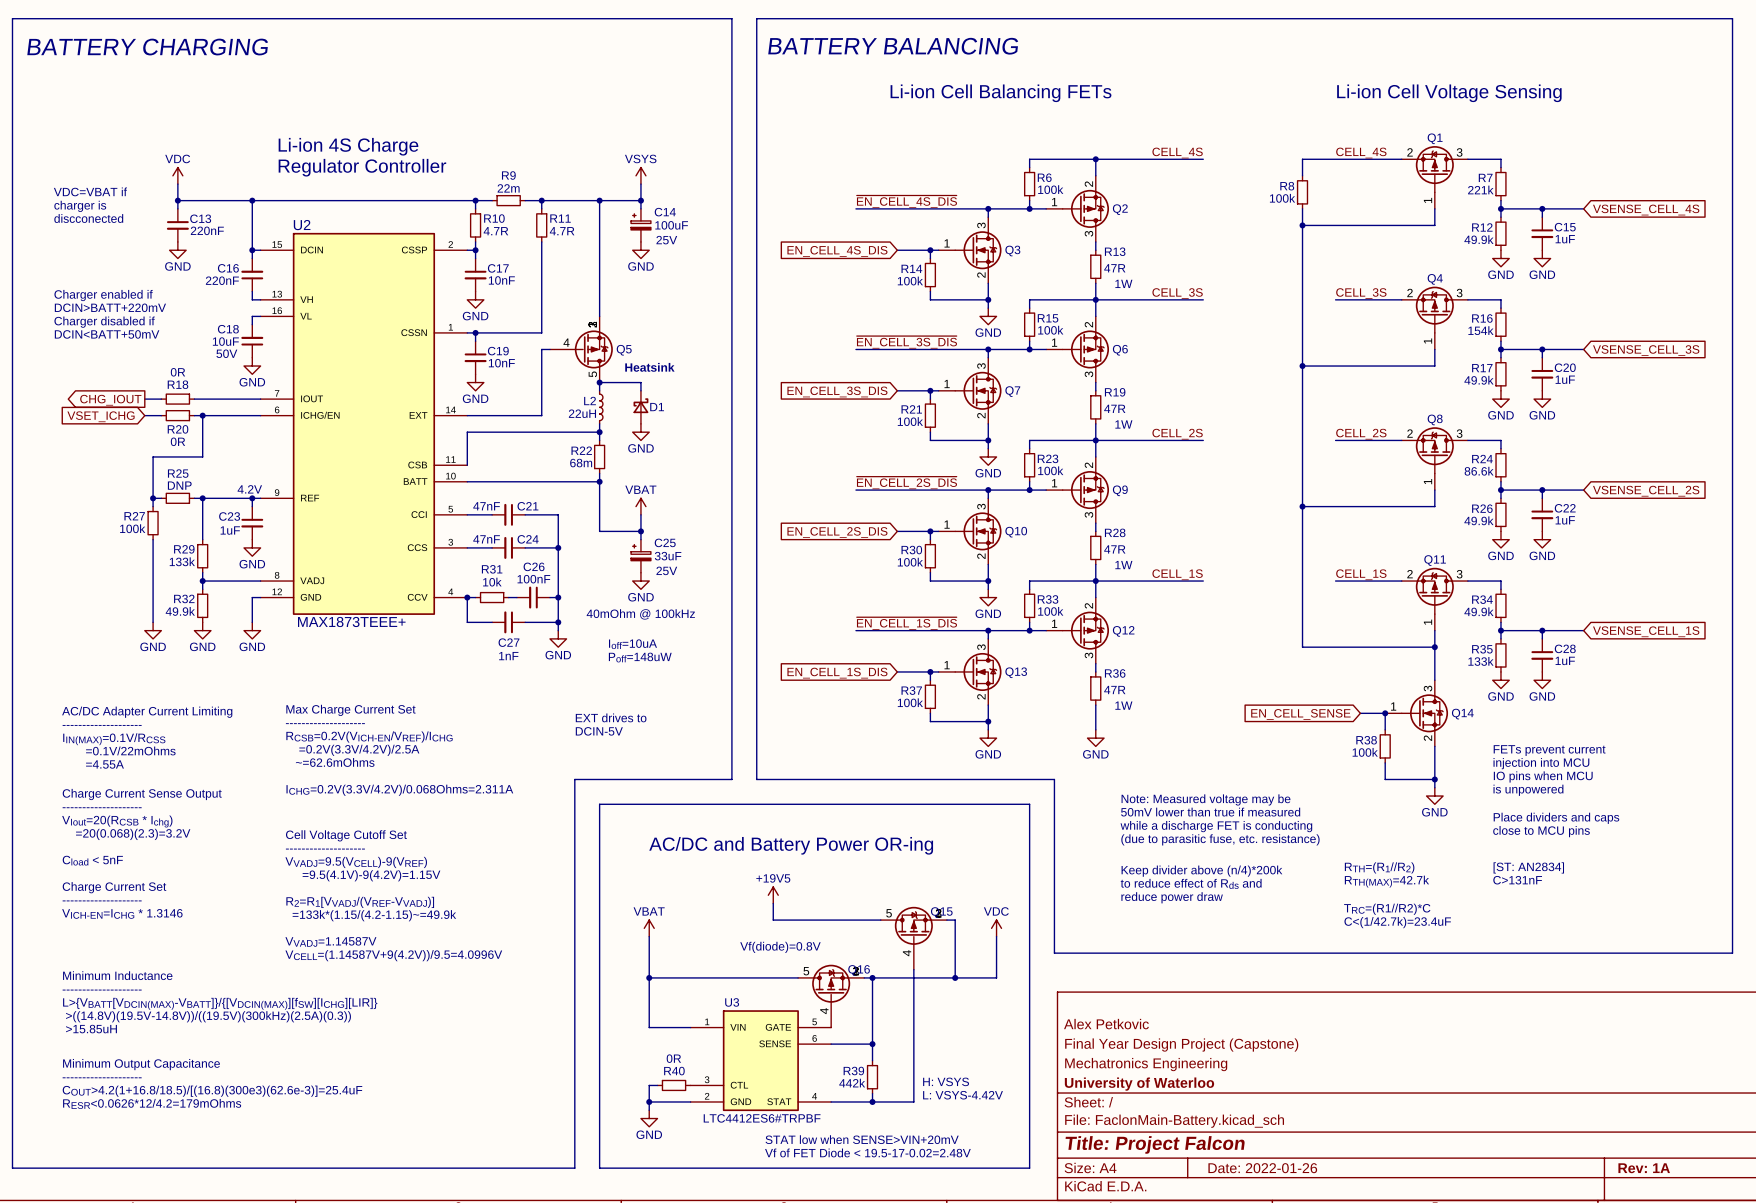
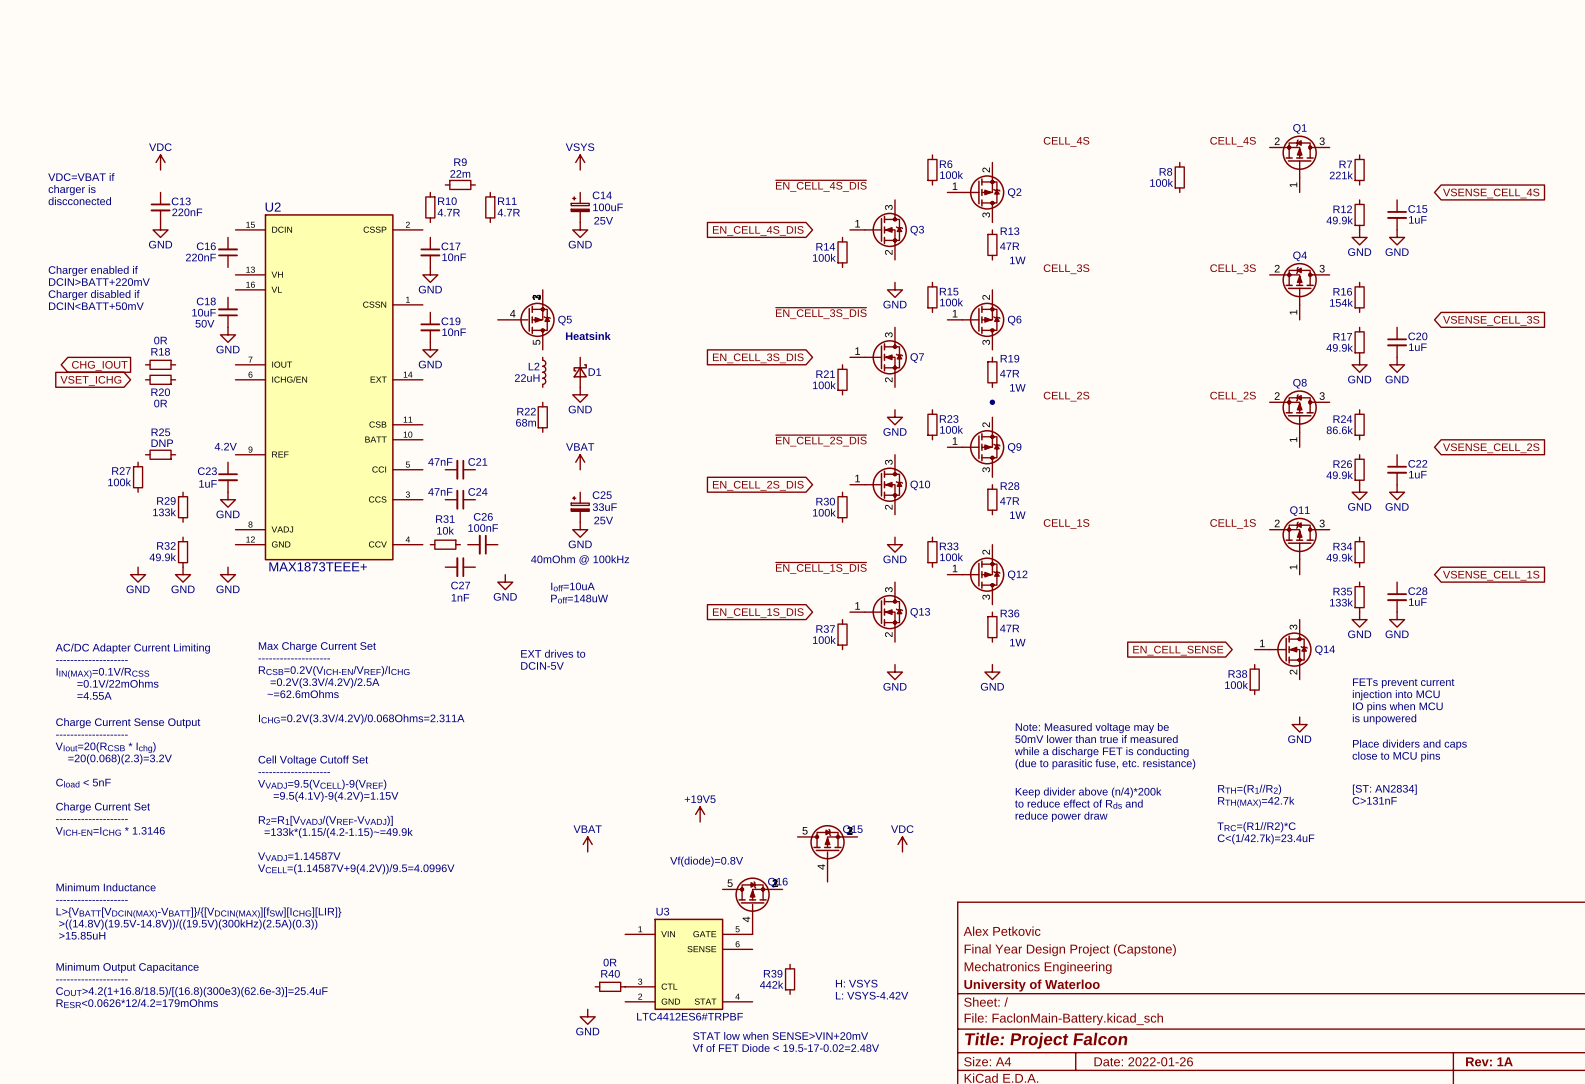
line: (12, 18) (12, 1168) (574, 1168) (574, 779) (731, 779) (731, 18) (12, 18) -> none
line: (756, 18) (1732, 18) (1732, 953) (1054, 953) (1054, 779) (756, 779) (756, 18) -> none
text: BATTERY BALANCING (893, 46) -> none
text: BATTERY CHARGING (147, 47) -> none
text: Li-ion Cell Balancing FETs (1001, 93) -> none
text: Li-ion Cell Voltage Sensing (1449, 93) -> none
text: Li-ion 4S Charge (348, 146) -> none
wire: (1095, 159) (1095, 175) -> none
junction: (1095, 159) -> none
wire: (1203, 159) (1029, 159) (1029, 167) -> none
wire: (1401, 159) (1302, 159) (1302, 175) -> none
wire: (1467, 159) (1500, 159) (1500, 167) -> none
text: Regulator Controller (362, 167) -> none
wire: (177, 184) (177, 208) -> none
wire: (640, 184) (640, 208) -> none
wire: (177, 200) (492, 200) -> none
junction: (177, 200) -> none
wire: (252, 200) (252, 258) -> none
junction: (252, 200) -> none
wire: (475, 200) (475, 208) -> none
junction: (475, 200) -> none
wire: (525, 200) (640, 200) -> none
wire: (541, 200) (541, 208) -> none
junction: (541, 200) -> none
wire: (599, 200) (599, 316) -> none
junction: (599, 200) -> none
junction: (640, 200) -> none
wire: (1029, 200) (1029, 208) -> none
wire: (1500, 200) (1500, 217) -> none
wire: (855, 208) (1046, 208) -> none
wire: (988, 208) (988, 217) -> none
junction: (988, 208) -> none
junction: (1029, 208) -> none
wire: (1302, 208) (1302, 647) (1434, 647) -> none
wire: (1434, 208) (1434, 225) (1302, 225) -> none
wire: (1500, 208) (1583, 208) -> none
junction: (1500, 208) -> none
wire: (1542, 208) (1542, 217) -> none
junction: (1542, 208) -> none
junction: (1302, 225) -> none
wire: (475, 241) (475, 258) -> none
wire: (541, 241) (541, 332) (467, 332) -> none
wire: (1095, 241) (1095, 250) -> none
wire: (252, 250) (260, 250) -> none
junction: (252, 250) -> none
wire: (467, 250) (475, 250) -> none
junction: (475, 250) -> none
wire: (897, 250) (938, 250) -> none
wire: (930, 250) (930, 258) -> none
junction: (930, 250) -> none
wire: (988, 283) (988, 308) -> none
wire: (1095, 283) (1095, 316) -> none
wire: (252, 291) (252, 299) (260, 299) -> none
wire: (930, 291) (930, 299) (988, 299) -> none
junction: (988, 299) -> none
junction: (1095, 299) -> none
wire: (1203, 299) (1029, 299) (1029, 308) -> none
wire: (1335, 299) (1401, 299) -> none
wire: (1467, 299) (1500, 299) (1500, 308) -> none
wire: (260, 316) (252, 316) (252, 324) -> none
wire: (475, 332) (475, 341) -> none
junction: (475, 332) -> none
wire: (1029, 341) (1029, 349) -> none
wire: (1500, 341) (1500, 357) -> none
wire: (550, 349) (541, 349) (541, 415) (467, 415) -> none
wire: (855, 349) (1046, 349) -> none
wire: (988, 349) (988, 357) -> none
junction: (988, 349) -> none
junction: (1029, 349) -> none
wire: (1434, 349) (1434, 366) (1302, 366) -> none
wire: (1500, 349) (1583, 349) -> none
junction: (1500, 349) -> none
wire: (1542, 349) (1542, 357) -> none
junction: (1542, 349) -> none
junction: (1302, 366) -> none
junction: (599, 382) -> none
wire: (1095, 382) (1095, 390) -> none
wire: (599, 390) (599, 382) (640, 382) (640, 390) -> none
wire: (897, 390) (938, 390) -> none
wire: (930, 390) (930, 399) -> none
junction: (930, 390) -> none
wire: (144, 399) (161, 399) -> none
wire: (194, 399) (260, 399) -> none
wire: (144, 415) (161, 415) -> none
wire: (194, 415) (260, 415) -> none
wire: (202, 415) (202, 456) (153, 456) (153, 506) -> none
junction: (202, 415) -> none
wire: (599, 423) (599, 440) -> none
wire: (988, 423) (988, 448) -> none
wire: (1095, 423) (1095, 456) -> none
wire: (599, 432) (467, 432) (467, 465) -> none
junction: (599, 432) -> none
wire: (930, 432) (930, 440) (988, 440) -> none
junction: (988, 440) -> none
wire: (1203, 440) (1029, 440) (1029, 448) -> none
wire: (1335, 440) (1401, 440) -> none
wire: (1467, 440) (1500, 440) (1500, 448) -> none
wire: (599, 473) (599, 531) (640, 531) -> none
wire: (467, 481) (599, 481) -> none
junction: (599, 481) -> none
wire: (1029, 481) (1029, 490) -> none
wire: (1500, 481) (1500, 498) -> none
wire: (855, 490) (1046, 490) -> none
wire: (988, 490) (988, 498) -> none
junction: (988, 490) -> none
junction: (1029, 490) -> none
wire: (1434, 490) (1434, 506) (1302, 506) -> none
wire: (1500, 490) (1583, 490) -> none
junction: (1500, 490) -> none
wire: (1542, 490) (1542, 498) -> none
junction: (1542, 490) -> none
wire: (153, 498) (161, 498) -> none
junction: (153, 498) -> none
wire: (194, 498) (260, 498) -> none
wire: (202, 498) (202, 539) -> none
junction: (202, 498) -> none
wire: (252, 498) (252, 506) -> none
junction: (252, 498) -> none
junction: (1302, 506) -> none
wire: (467, 514) (492, 514) -> none
wire: (525, 514) (558, 514) (558, 630) -> none
wire: (640, 514) (640, 539) -> none
wire: (1095, 523) (1095, 531) -> none
junction: (640, 531) -> none
wire: (897, 531) (938, 531) -> none
wire: (930, 531) (930, 539) -> none
junction: (930, 531) -> none
wire: (153, 539) (153, 622) -> none
wire: (467, 547) (492, 547) -> none
wire: (525, 547) (558, 547) -> none
junction: (558, 547) -> none
wire: (988, 564) (988, 589) -> none
wire: (1095, 564) (1095, 597) -> none
wire: (202, 572) (202, 589) -> none
wire: (930, 572) (930, 581) (988, 581) -> none
wire: (202, 581) (260, 581) -> none
junction: (202, 581) -> none
junction: (988, 581) -> none
junction: (1095, 581) -> none
wire: (1203, 581) (1029, 581) (1029, 589) -> none
wire: (1335, 581) (1401, 581) -> none
wire: (1467, 581) (1500, 581) (1500, 589) -> none
wire: (260, 597) (252, 597) (252, 622) -> none
junction: (467, 597) -> none
wire: (475, 597) (467, 597) (467, 622) (492, 622) -> none
wire: (508, 597) (516, 597) -> none
wire: (550, 597) (558, 597) -> none
junction: (558, 597) -> none
wire: (525, 622) (558, 622) -> none
junction: (558, 622) -> none
wire: (1029, 622) (1029, 630) -> none
wire: (1500, 622) (1500, 638) -> none
wire: (855, 630) (1046, 630) -> none
wire: (988, 630) (988, 638) -> none
junction: (988, 630) -> none
junction: (1029, 630) -> none
wire: (1434, 630) (1434, 680) -> none
wire: (1500, 630) (1583, 630) -> none
junction: (1500, 630) -> none
wire: (1542, 630) (1542, 638) -> none
junction: (1542, 630) -> none
junction: (1434, 647) -> none
wire: (1095, 663) (1095, 671) -> none
wire: (897, 671) (938, 671) -> none
wire: (930, 671) (930, 680) -> none
junction: (930, 671) -> none
wire: (988, 705) (988, 729) -> none
wire: (1095, 705) (1095, 729) -> none
wire: (930, 713) (930, 721) (988, 721) -> none
wire: (1360, 713) (1385, 713) (1385, 729) -> none
junction: (1385, 713) -> none
junction: (988, 721) -> none
wire: (1434, 746) (1434, 787) -> none
wire: (1385, 762) (1385, 779) (1434, 779) -> none
junction: (1434, 779) -> none
line: (599, 804) (1029, 804) (1029, 1168) (599, 1168) (599, 804) -> none
text: AC/DC and Battery Power OR-ing (791, 845) -> none
wire: (773, 903) (773, 920) (880, 920) -> none
wire: (946, 920) (955, 920) (955, 977) -> none
wire: (649, 936) (649, 1027) (690, 1027) -> none
wire: (996, 936) (996, 977) (864, 977) -> none
wire: (913, 969) (913, 1101) (831, 1101) -> none
wire: (649, 977) (798, 977) -> none
junction: (649, 977) -> none
wire: (872, 977) (872, 1060) -> none
junction: (872, 977) -> none
junction: (955, 977) -> none
wire: (831, 1044) (872, 1044) -> none
junction: (872, 1044) -> none
wire: (657, 1085) (649, 1085) (649, 1110) -> none
wire: (872, 1093) (872, 1101) -> none
wire: (649, 1101) (690, 1101) -> none
junction: (649, 1101) -> none
junction: (872, 1101) -> none

